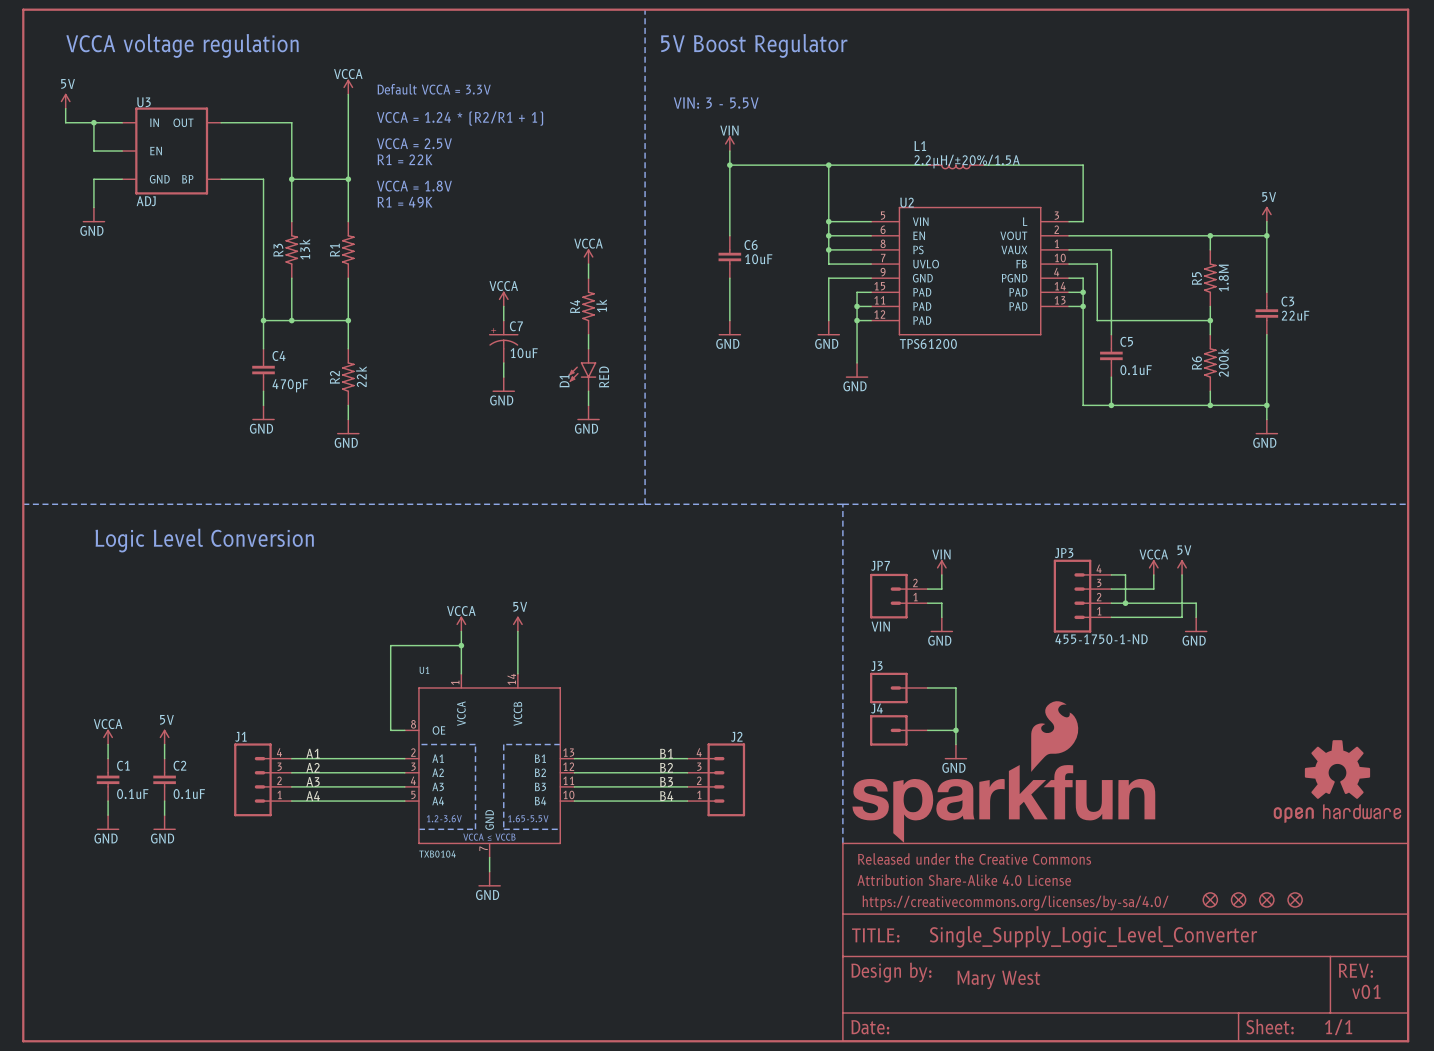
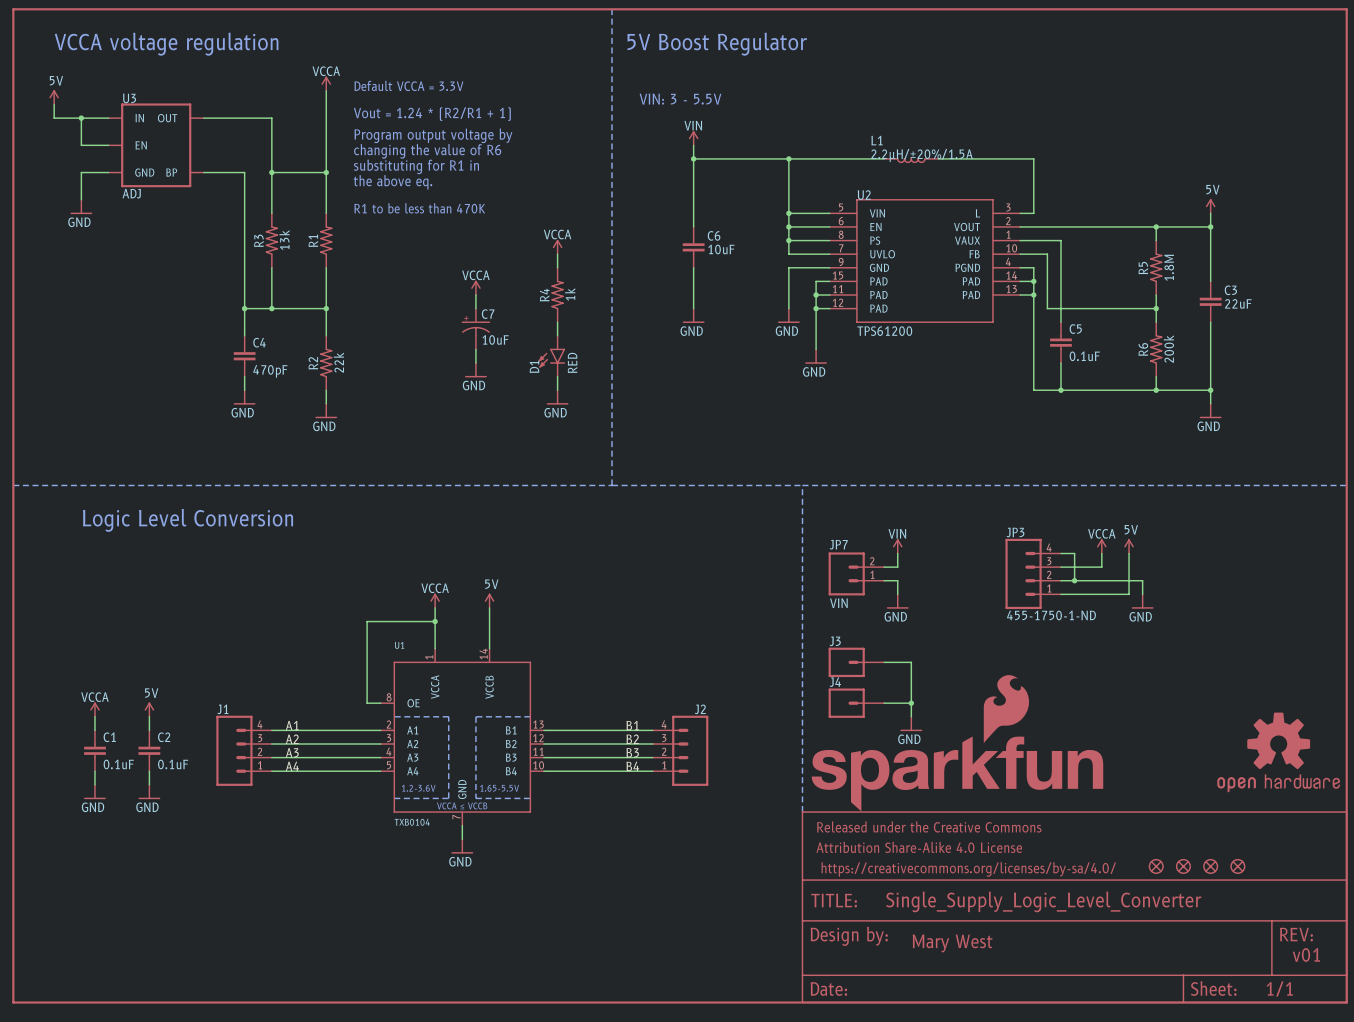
text: VCCA = 1.24 * (R2/R1 + 1) (460, 118) -> Vout = 1.24 * (R2/R1 + 1) (432, 114)
text: VCCA = 2.5V (414, 143) -> Program output voltage by (433, 135)
text: R1 = 22K (405, 159) -> changing the value of R6 (427, 151)
text: none -> substituting for R1 in (416, 166)
text: VCCA = 1.8V (414, 186) -> the above eq. (393, 182)
text: R1 = 49K (405, 202) -> none
text: none -> R1 to be less than 470K (419, 208)

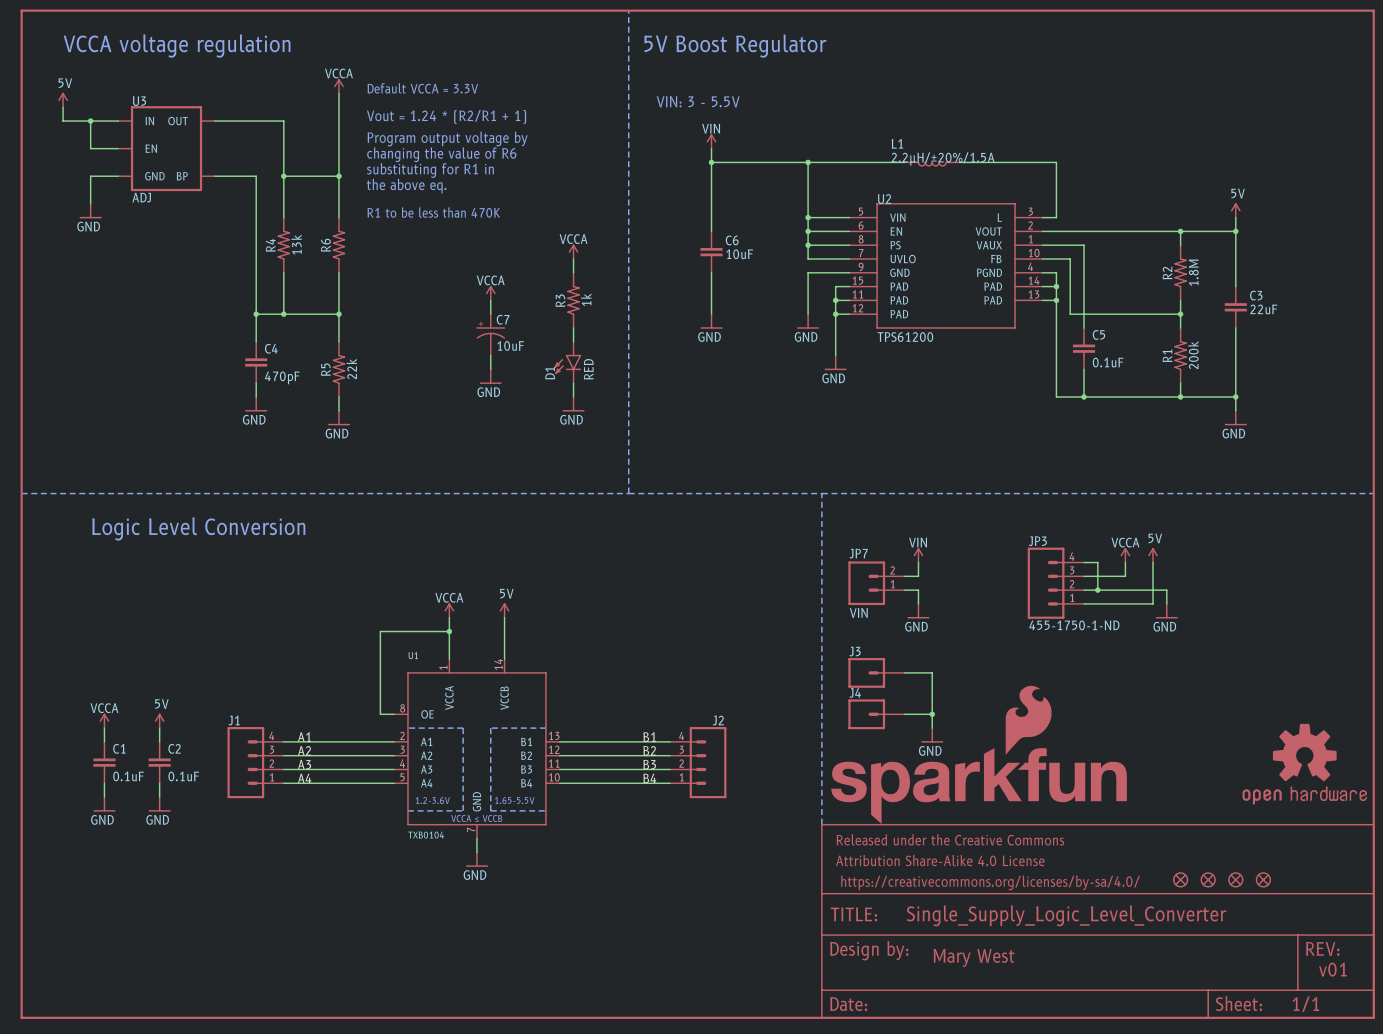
R3 name: R3 (258, 240) -> R4 (270, 245)
R1 name: R1 (313, 240) -> R6 (325, 245)
R5 name: R5 (1143, 268) -> R2 (1167, 273)
R4 name: R4 (544, 295) -> R3 (560, 300)
R6 name: R6 (1143, 349) -> R1 (1167, 355)
R2 name: R2 (313, 363) -> R5 (325, 369)

